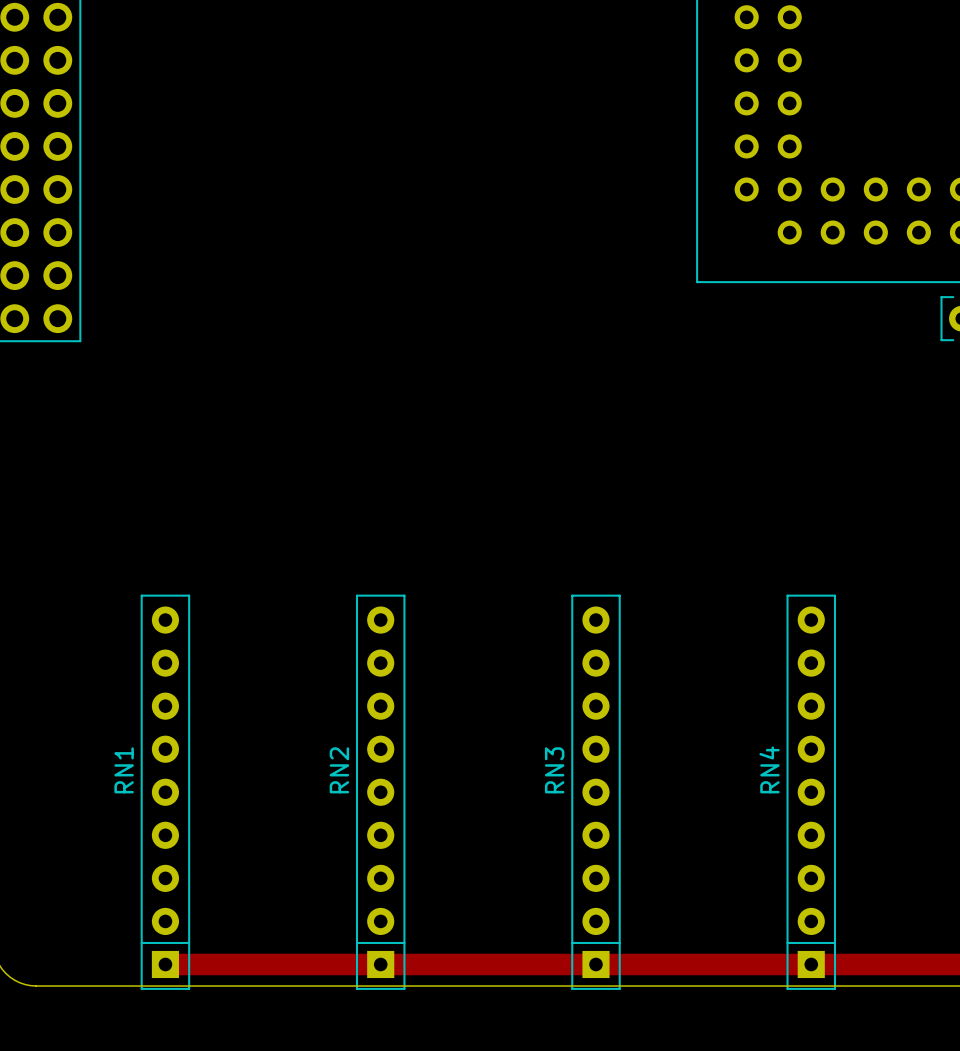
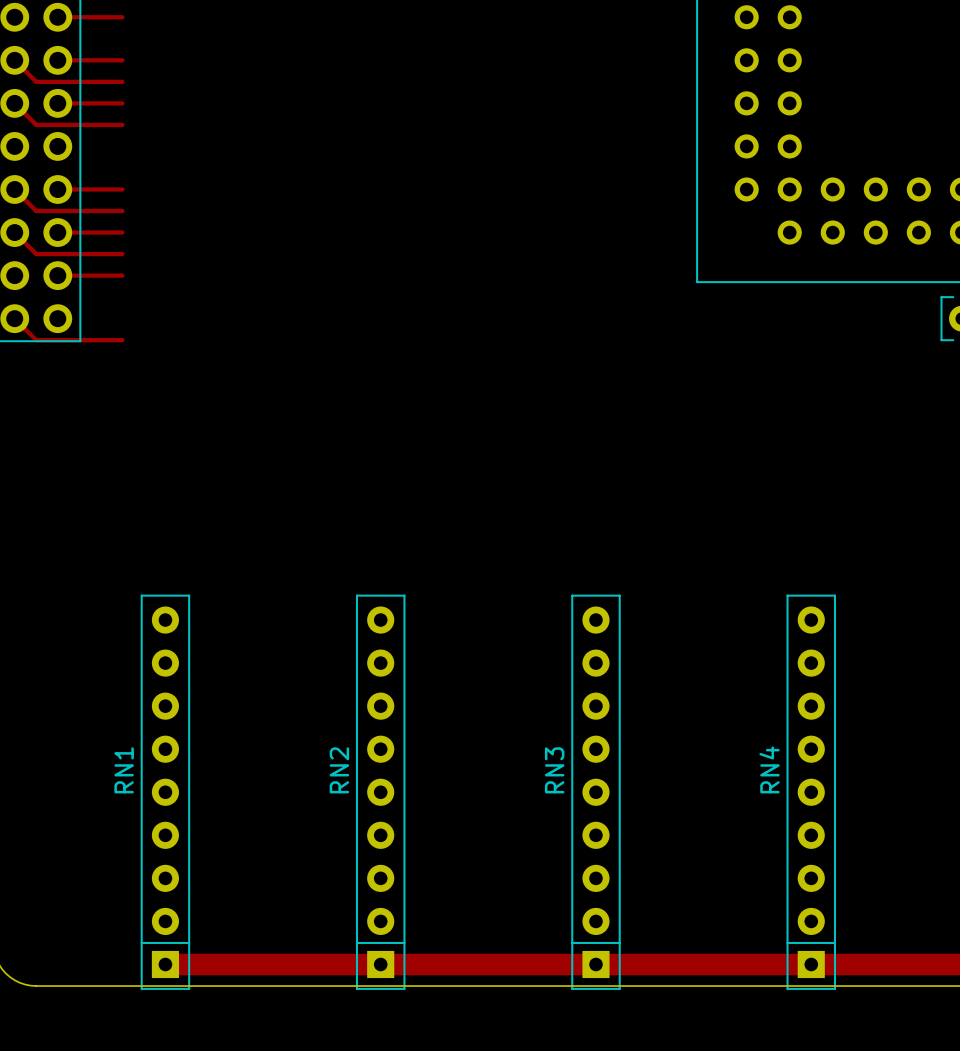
top track: none -> (57, 17) (122, 17)
top track: none -> (14, 60) (36, 81) (122, 81)
top track: none -> (57, 60) (122, 60)
top track: none -> (14, 103) (36, 124) (122, 124)
top track: none -> (57, 103) (122, 103)
top track: none -> (14, 189) (36, 211) (122, 211)
top track: none -> (57, 189) (122, 189)
top track: none -> (14, 232) (36, 254) (122, 254)
top track: none -> (57, 232) (122, 232)
top track: none -> (57, 275) (122, 275)
top track: none -> (14, 318) (36, 340) (122, 340)

